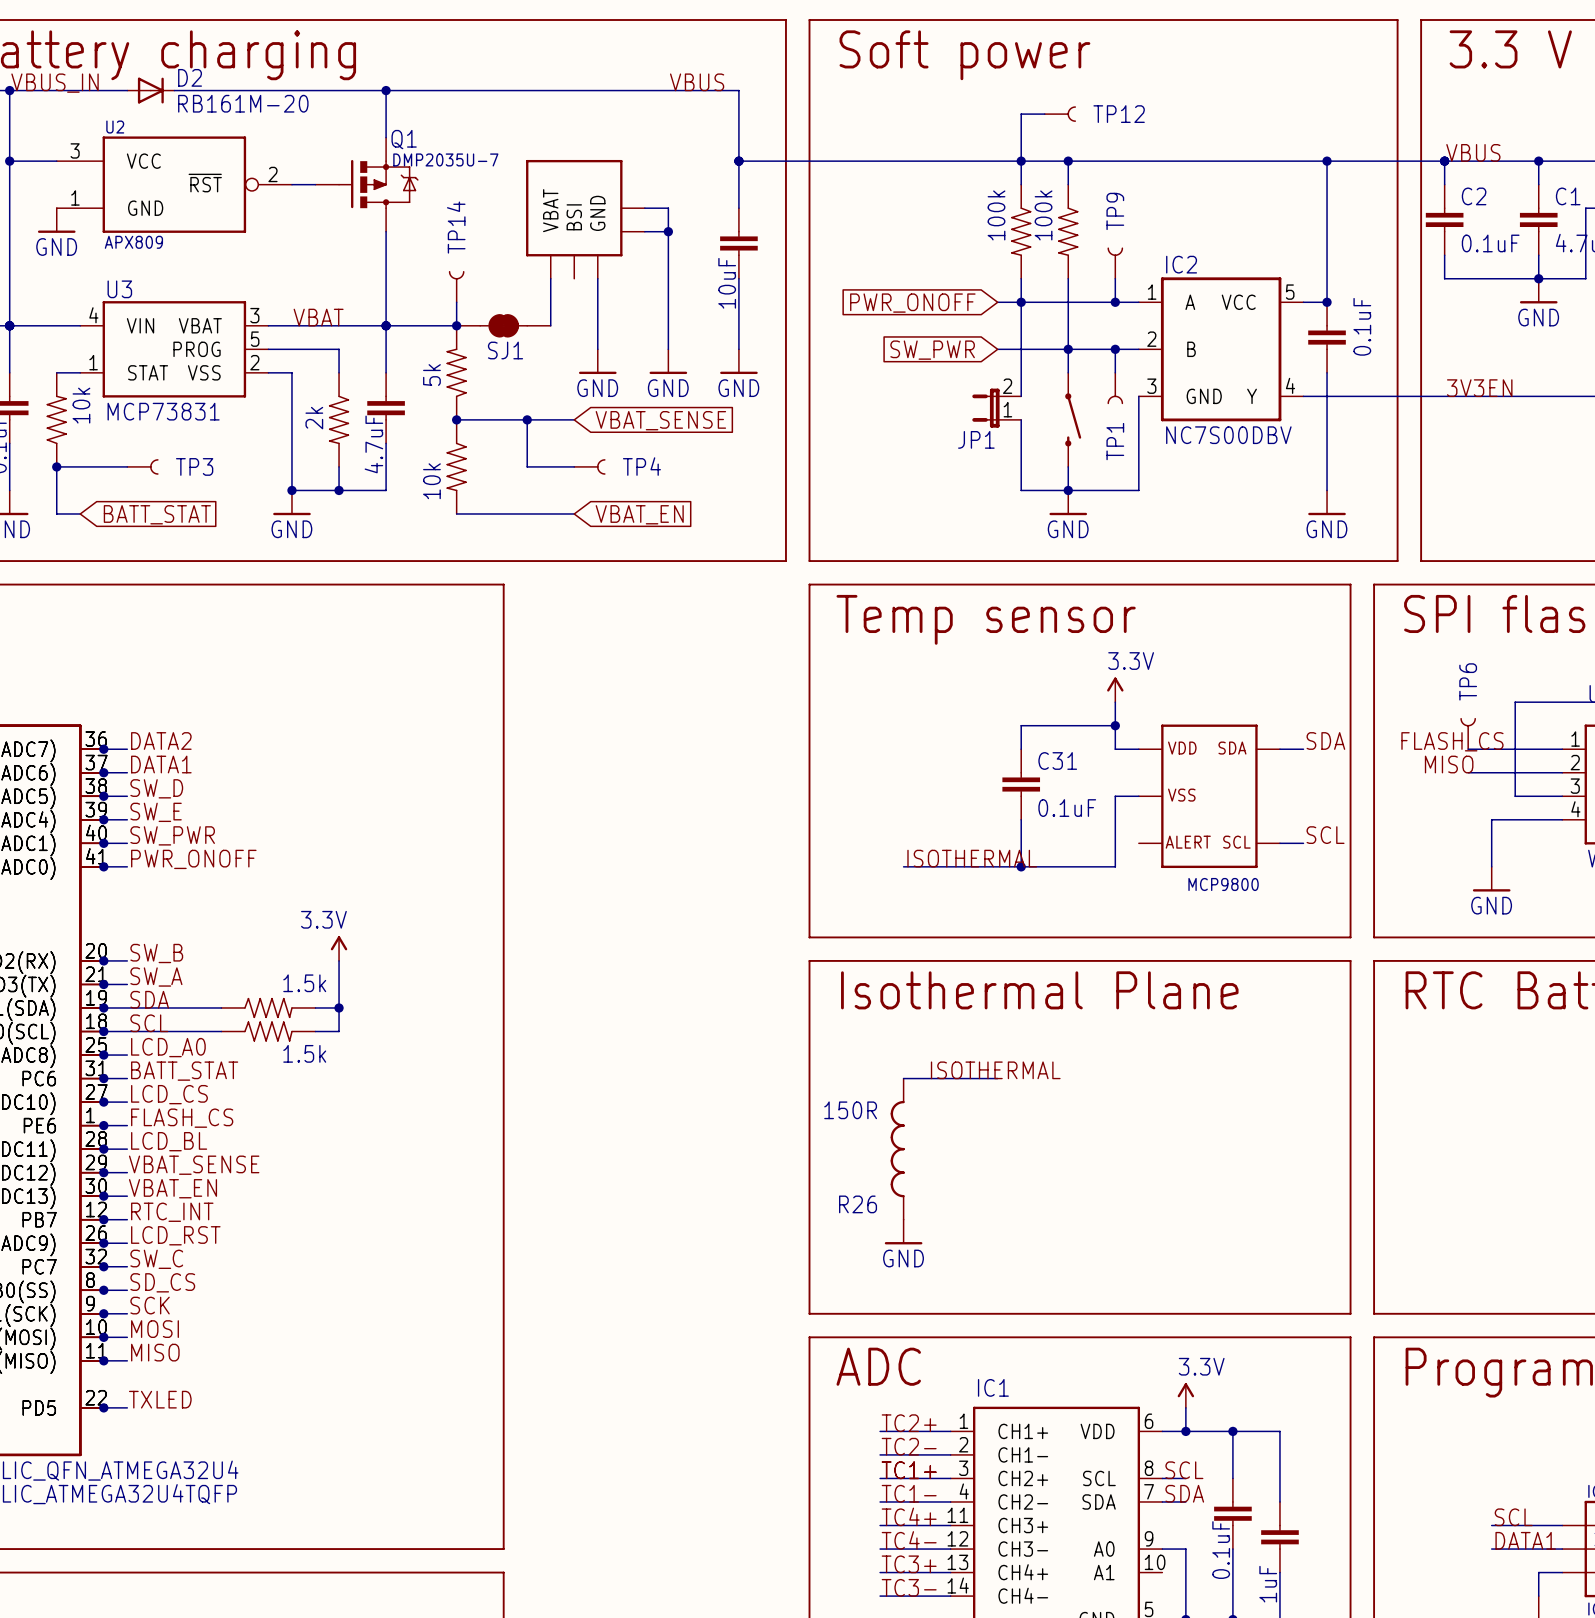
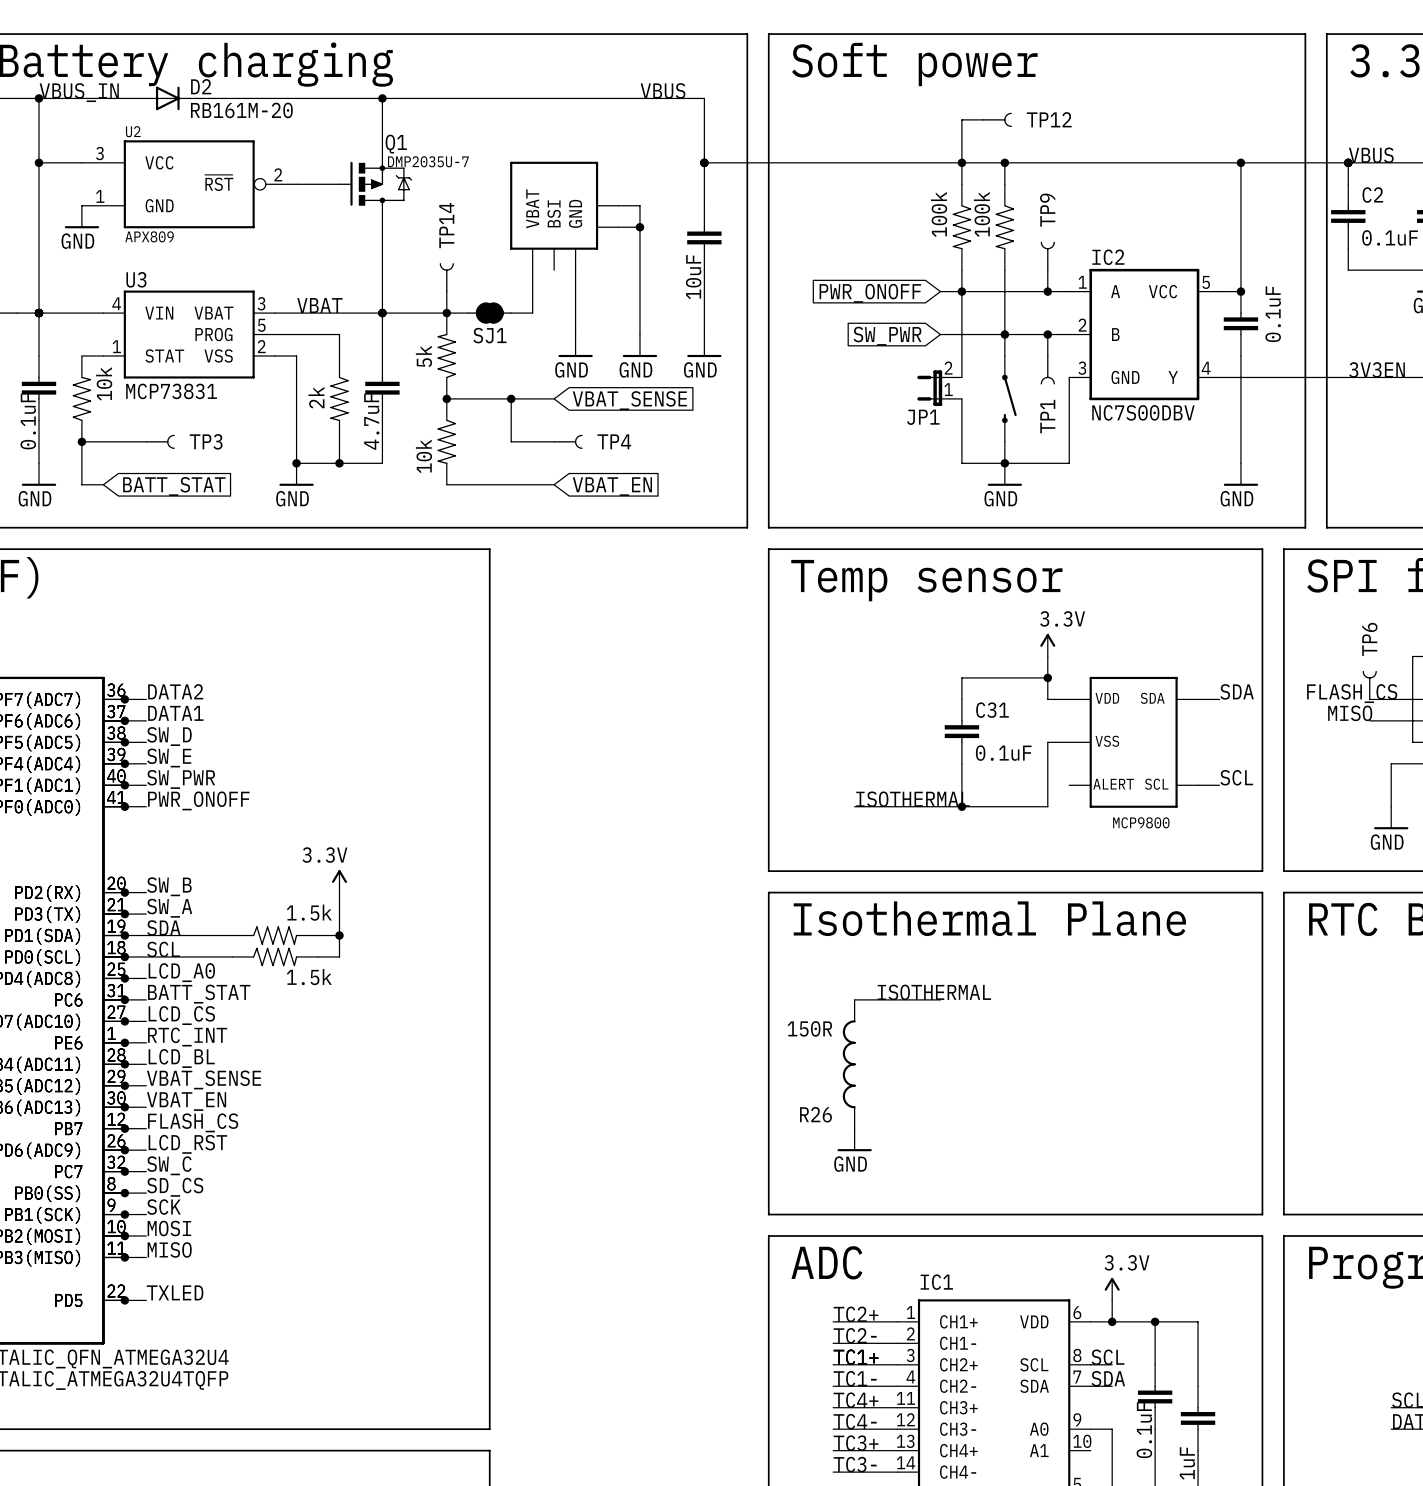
label: FLASH_CS (182, 1118) -> RTC_INT (187, 1037)
label: RTC_INT (172, 1212) -> FLASH_CS (193, 1122)

